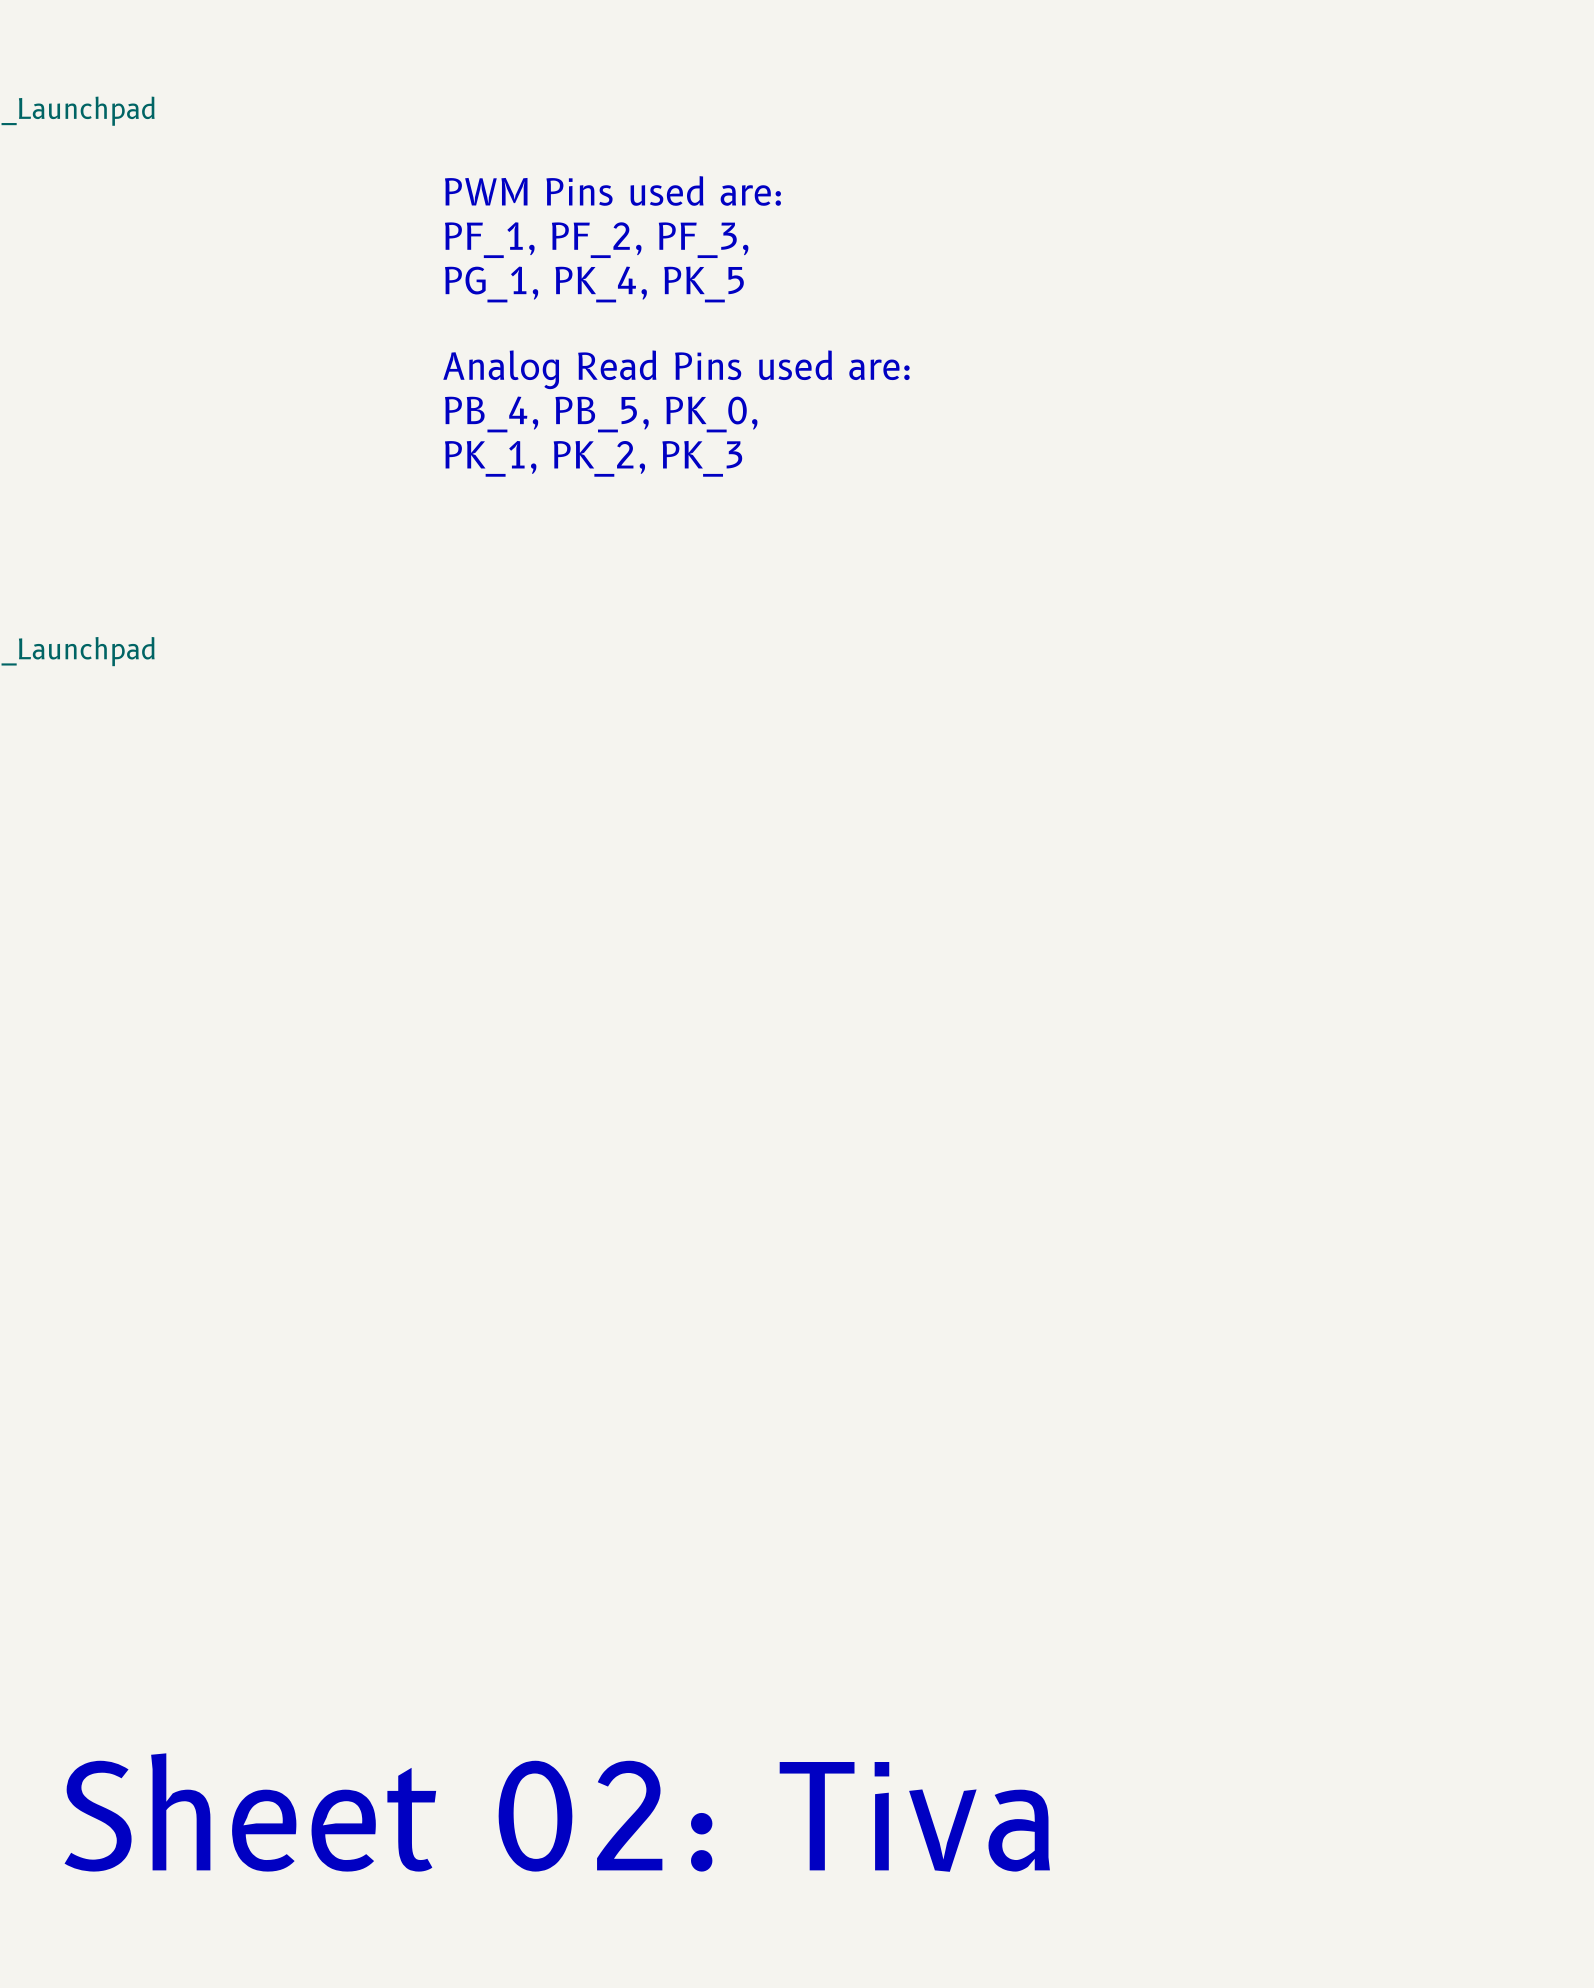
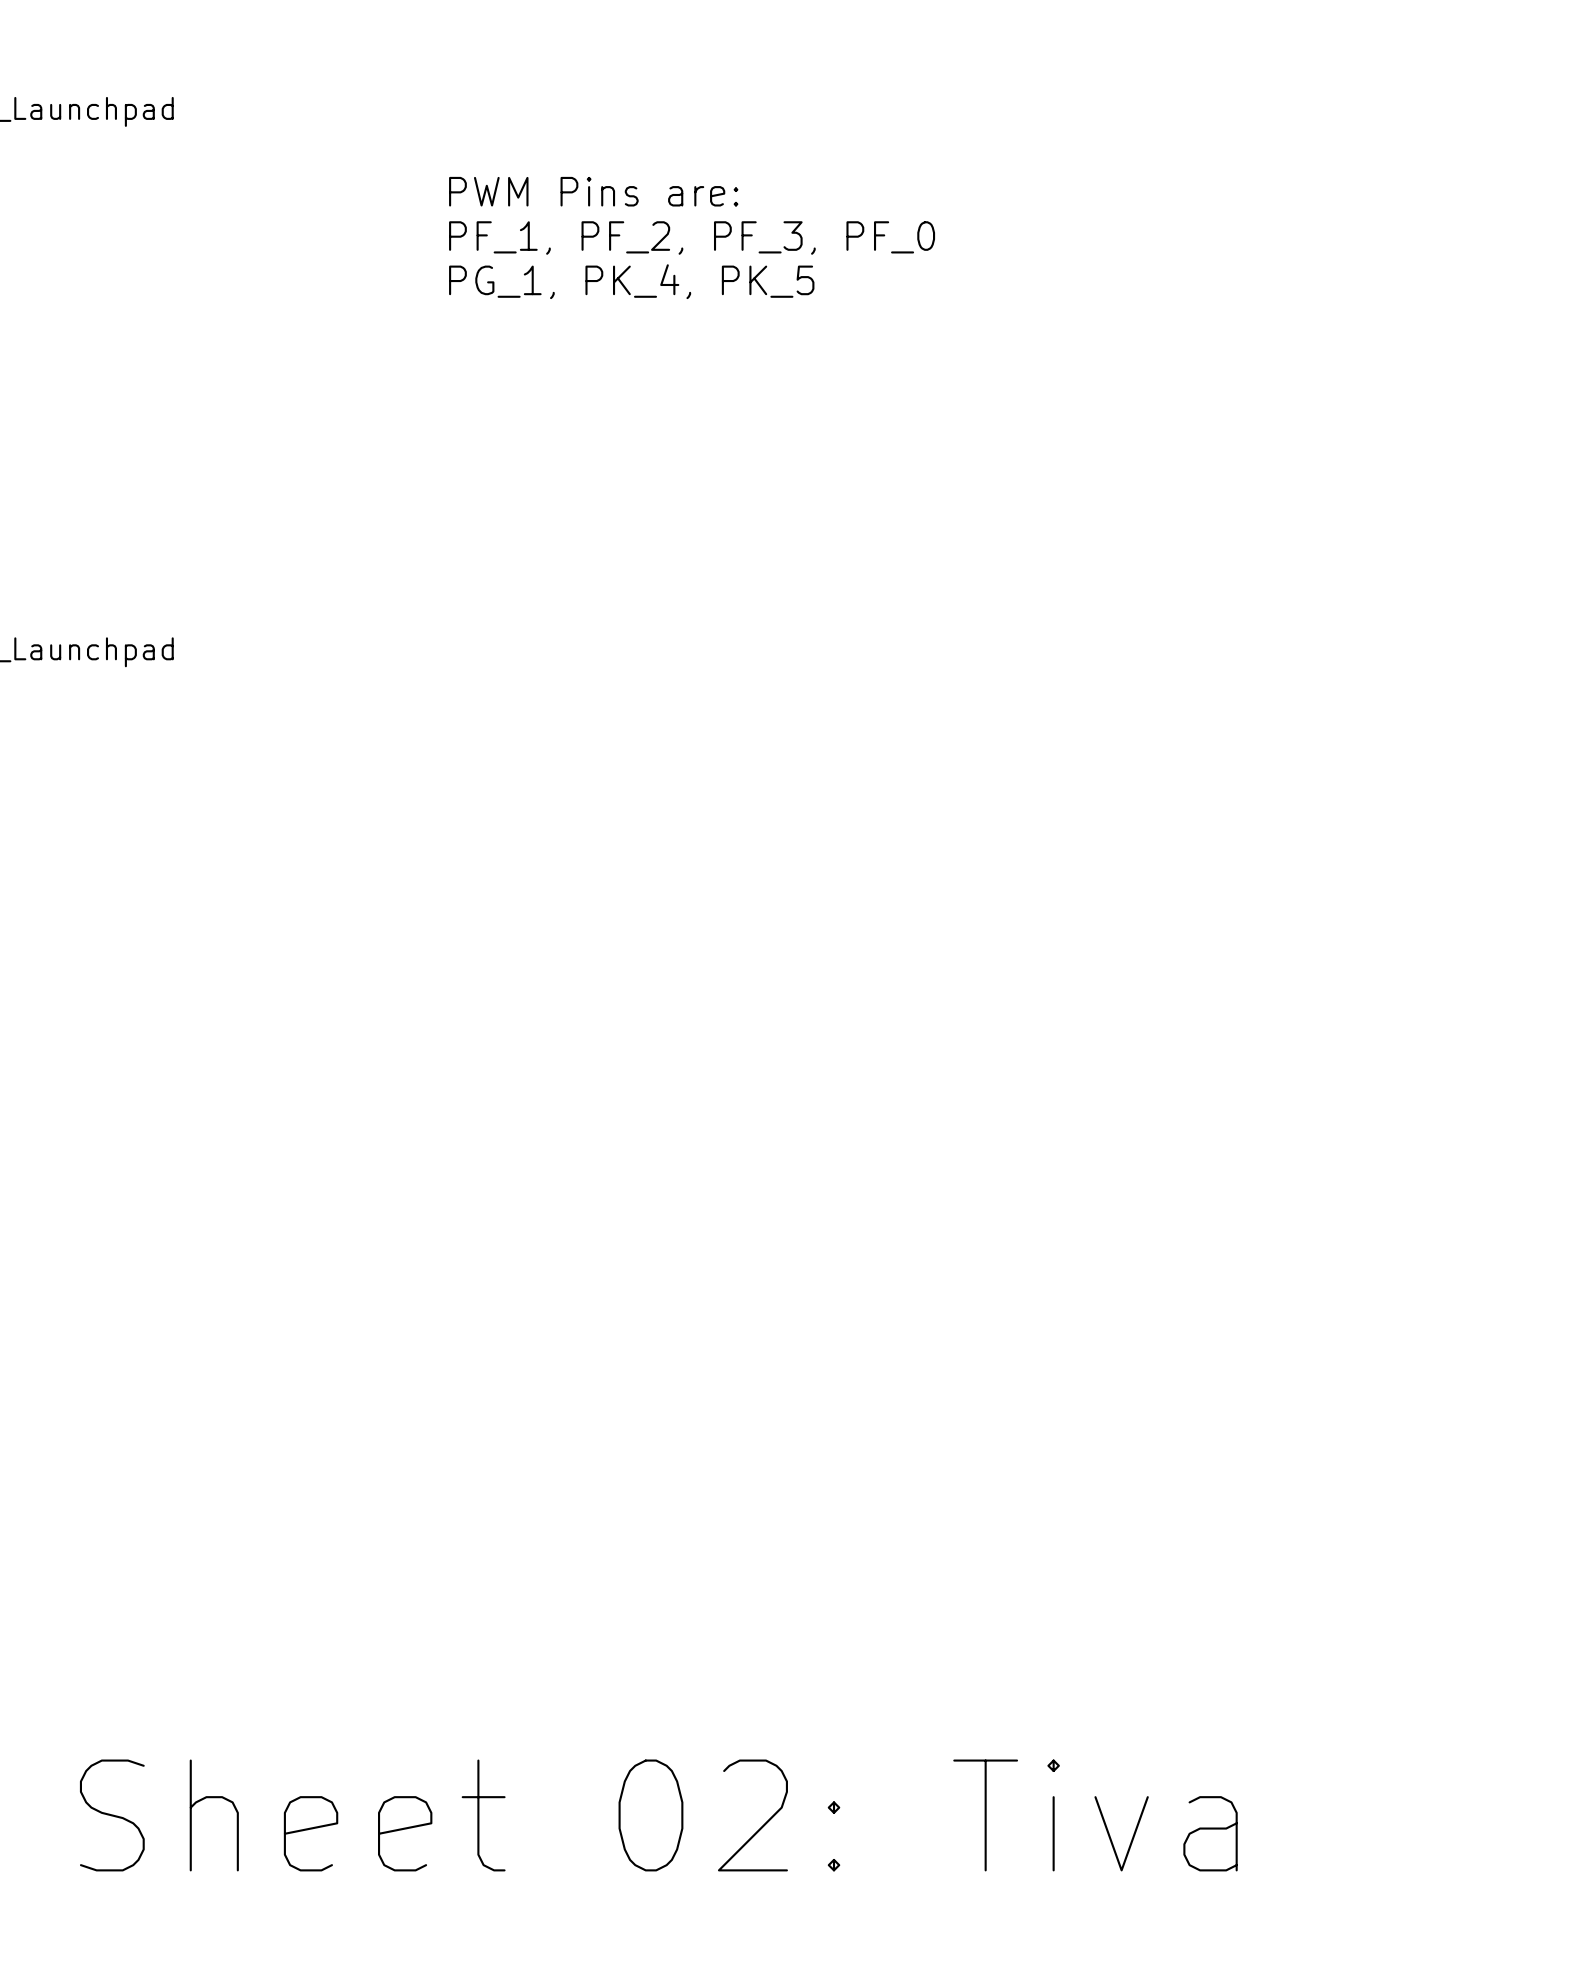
text: PWM Pins used are: (612, 190) -> PWM Pins are: (593, 191)
text: PF_1, PF_2, PF_3, (596, 240) -> PF_1, PF_2, PF_3, PF_0 (692, 238)
text: Analog Read Pins used are: (676, 369) -> none
text: PB_4, PB_5, PK_0, (601, 414) -> none
text: PK_1, PK_2, PK_3 (593, 458) -> none

